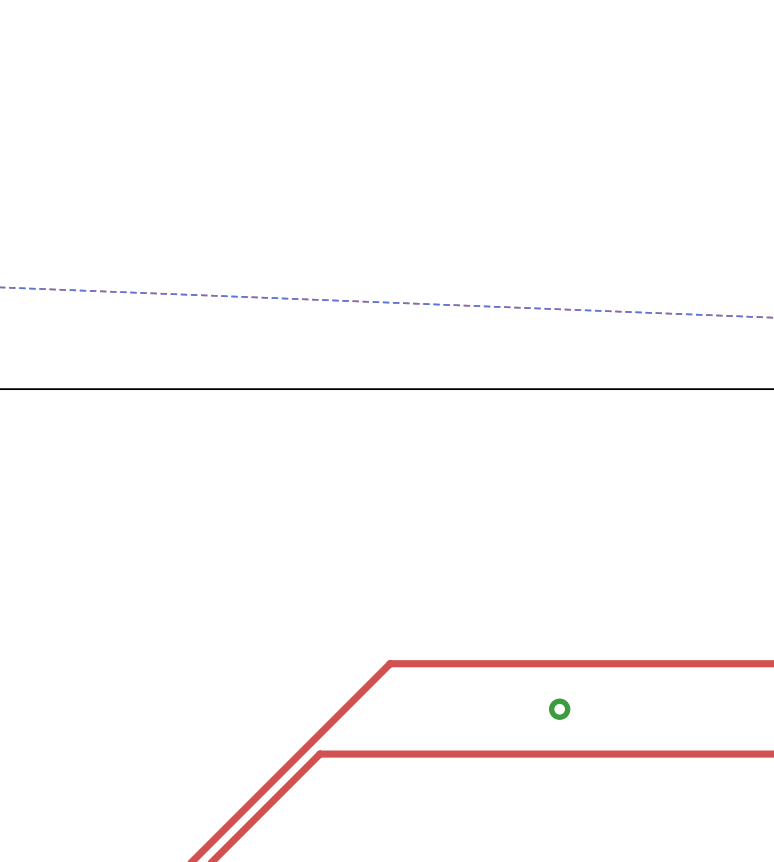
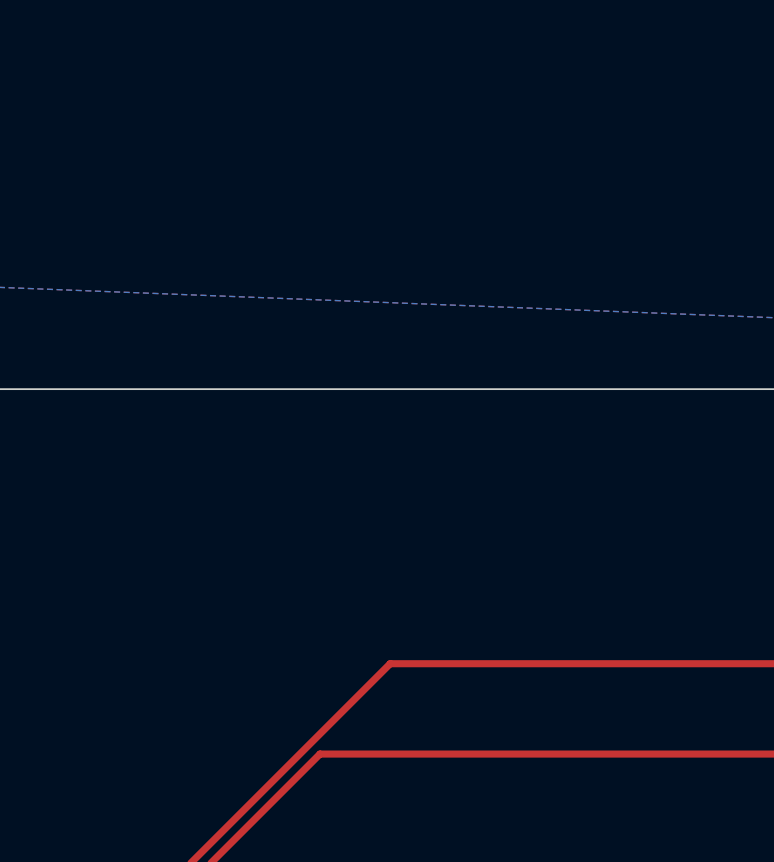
via: (559, 709) -> none

